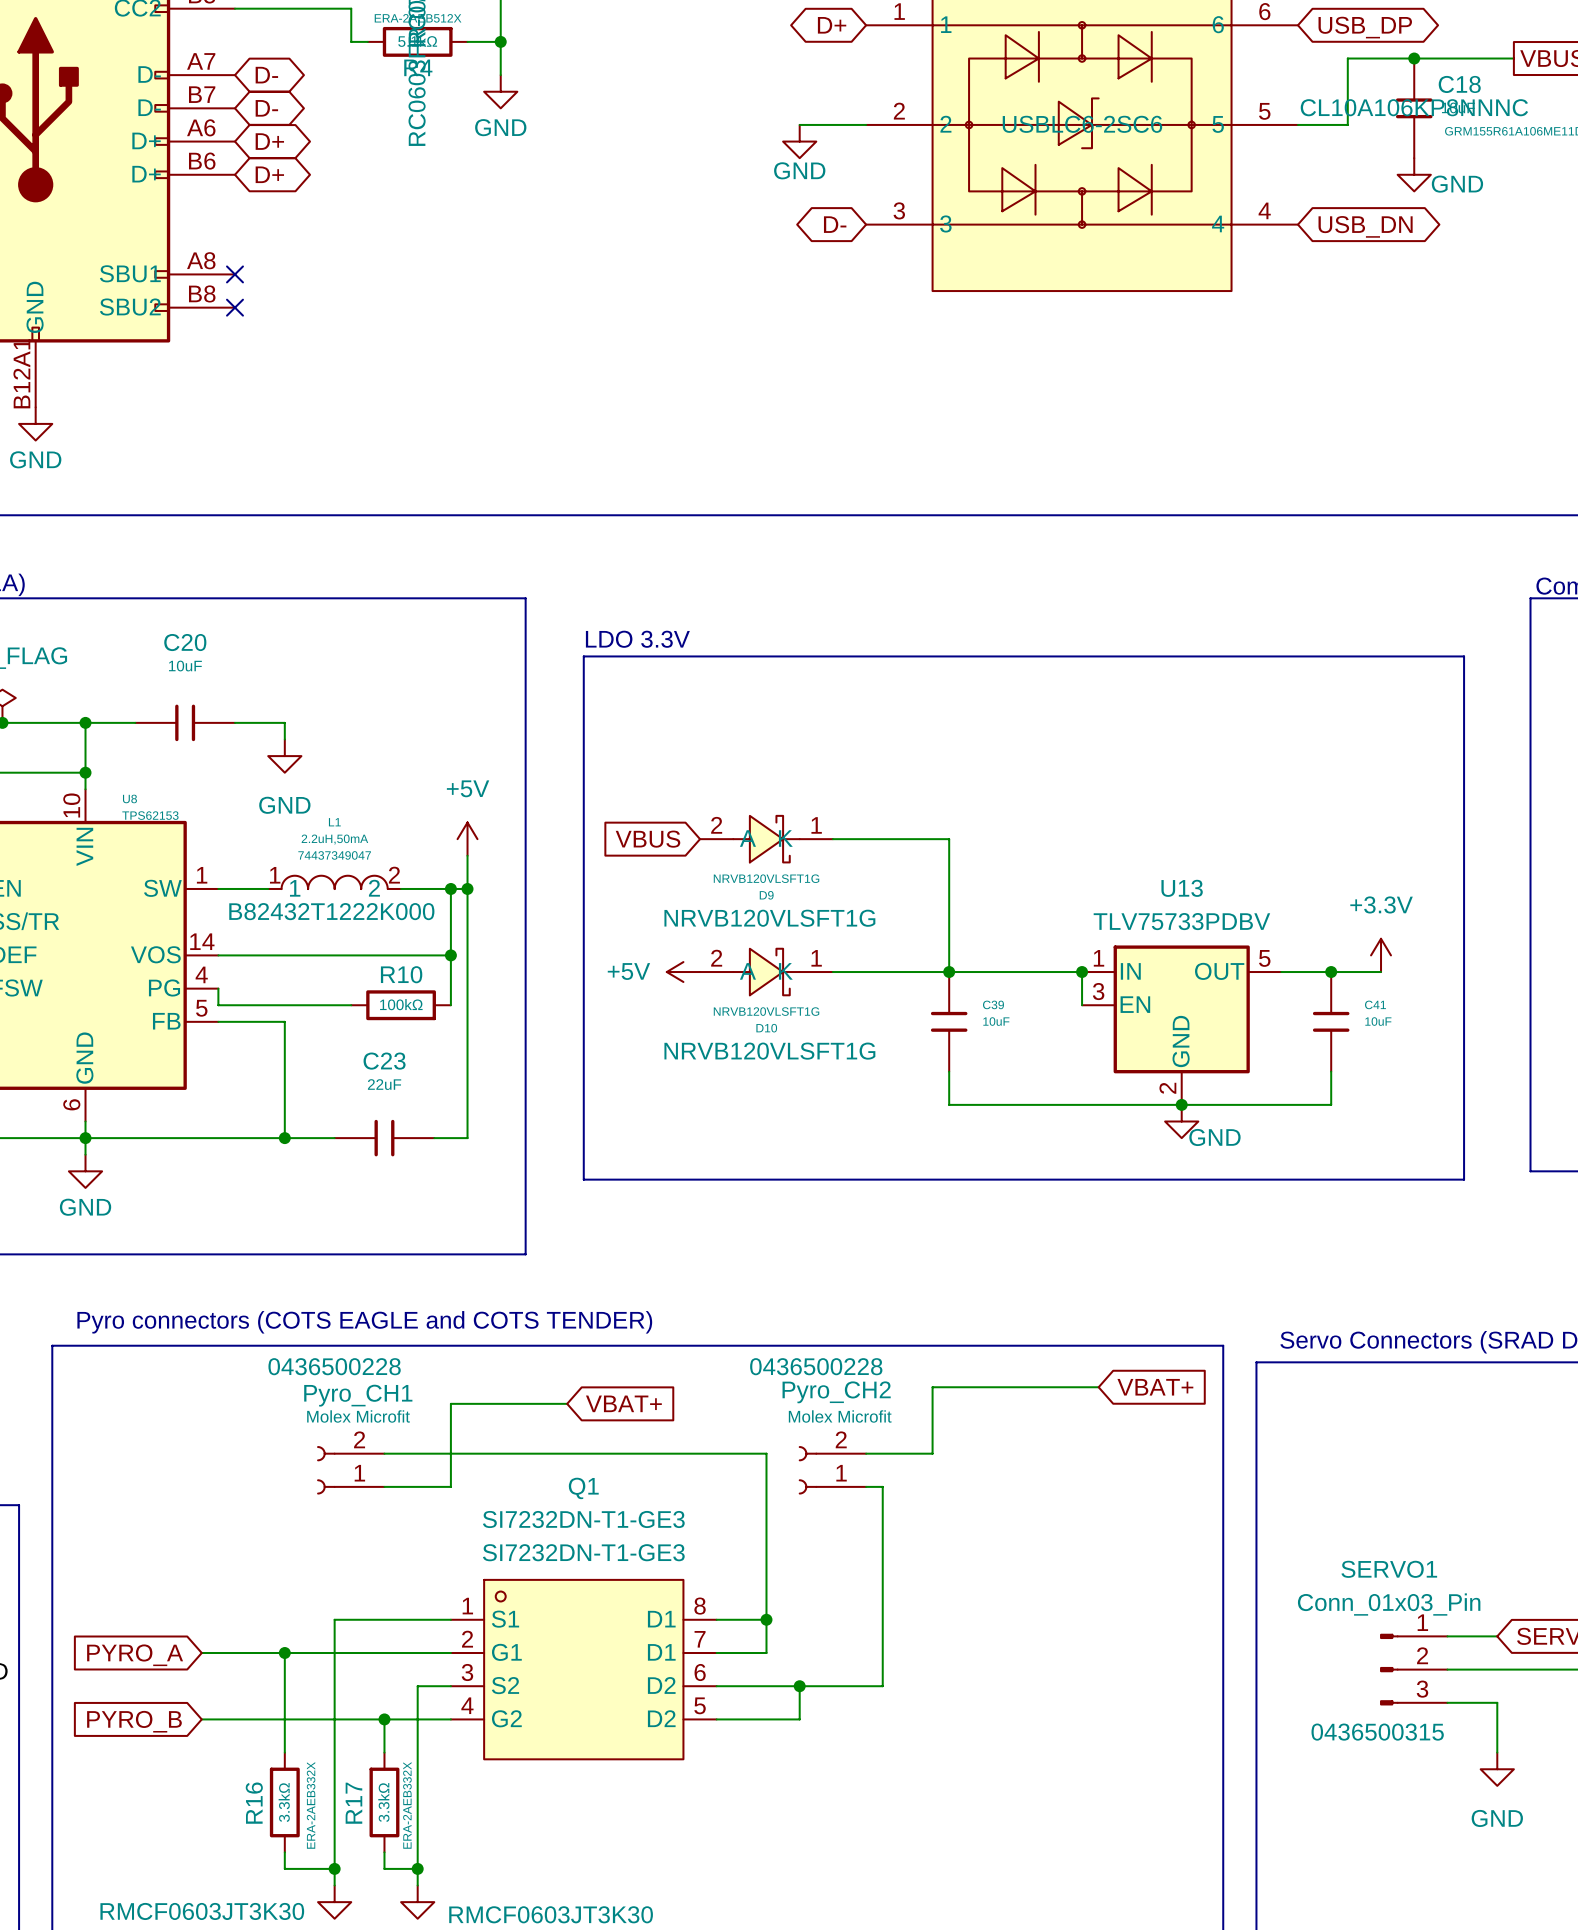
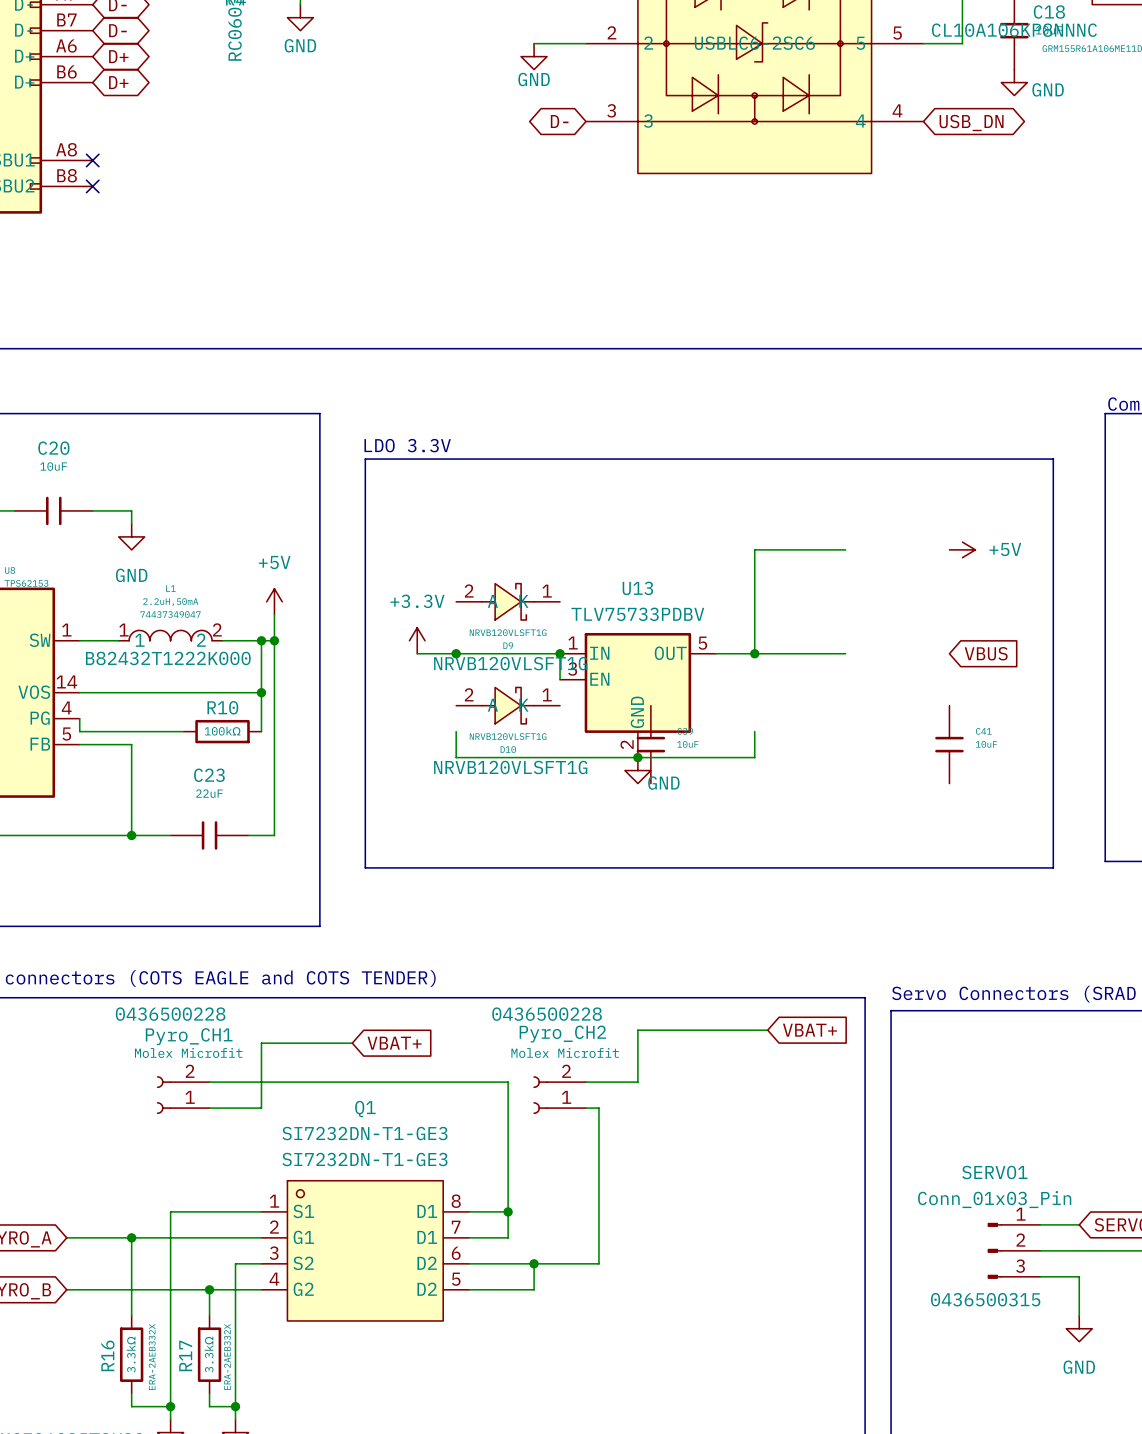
wire: none -> (845, 549) (754, 549) (754, 653)
power symbol: none -> +5V (962, 549)
global label: VBUS (647, 839) -> none
wire: (832, 839) (949, 839) (949, 972) -> none
power symbol: none -> +3.3V (417, 640)
wire: none -> (417, 653) (560, 653) (560, 679)
junction: none -> (456, 653)
junction: none -> (560, 653)
wire: none -> (715, 653) (845, 653)
global label: none -> VBUS (986, 653)
power symbol: +3.3V (1381, 955) -> none
power symbol: +5V (683, 972) -> none
wire: (832, 972) (1082, 972) (1082, 1005) -> (456, 731) (456, 757) (754, 757) (754, 731)
junction: (949, 972) -> none
junction position: (1082, 972) -> (754, 653)
wire: (1281, 972) (1381, 972) -> none
junction: (1331, 972) -> none
U13 position: (1181, 1025) -> (637, 695)
junction: none -> (637, 757)
wire: (949, 1071) (949, 1104) (1331, 1104) (1331, 1071) -> none
junction: (1181, 1104) -> none
power symbol position: GND (1181, 1121) -> GND (637, 770)

